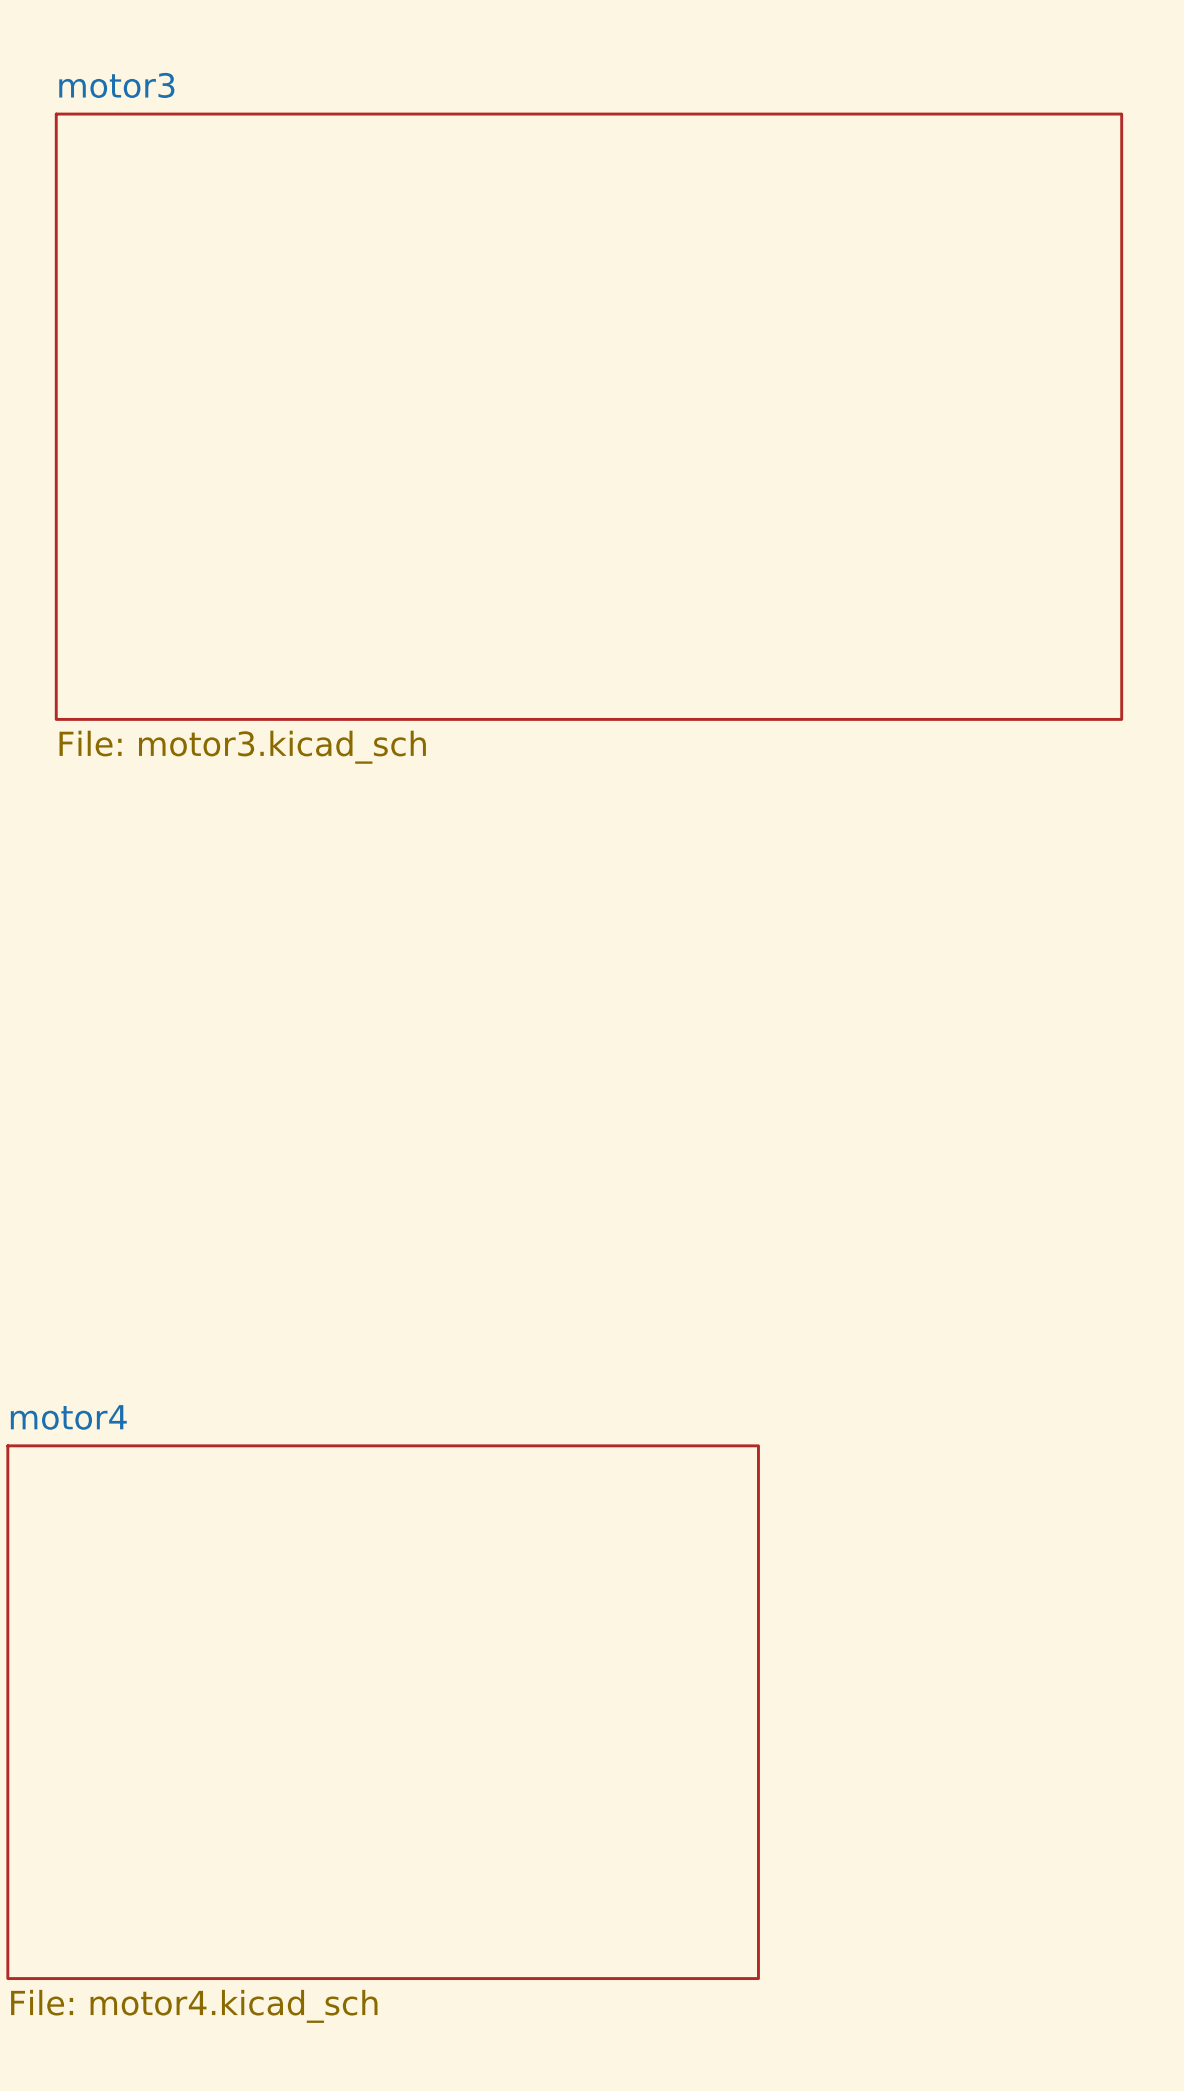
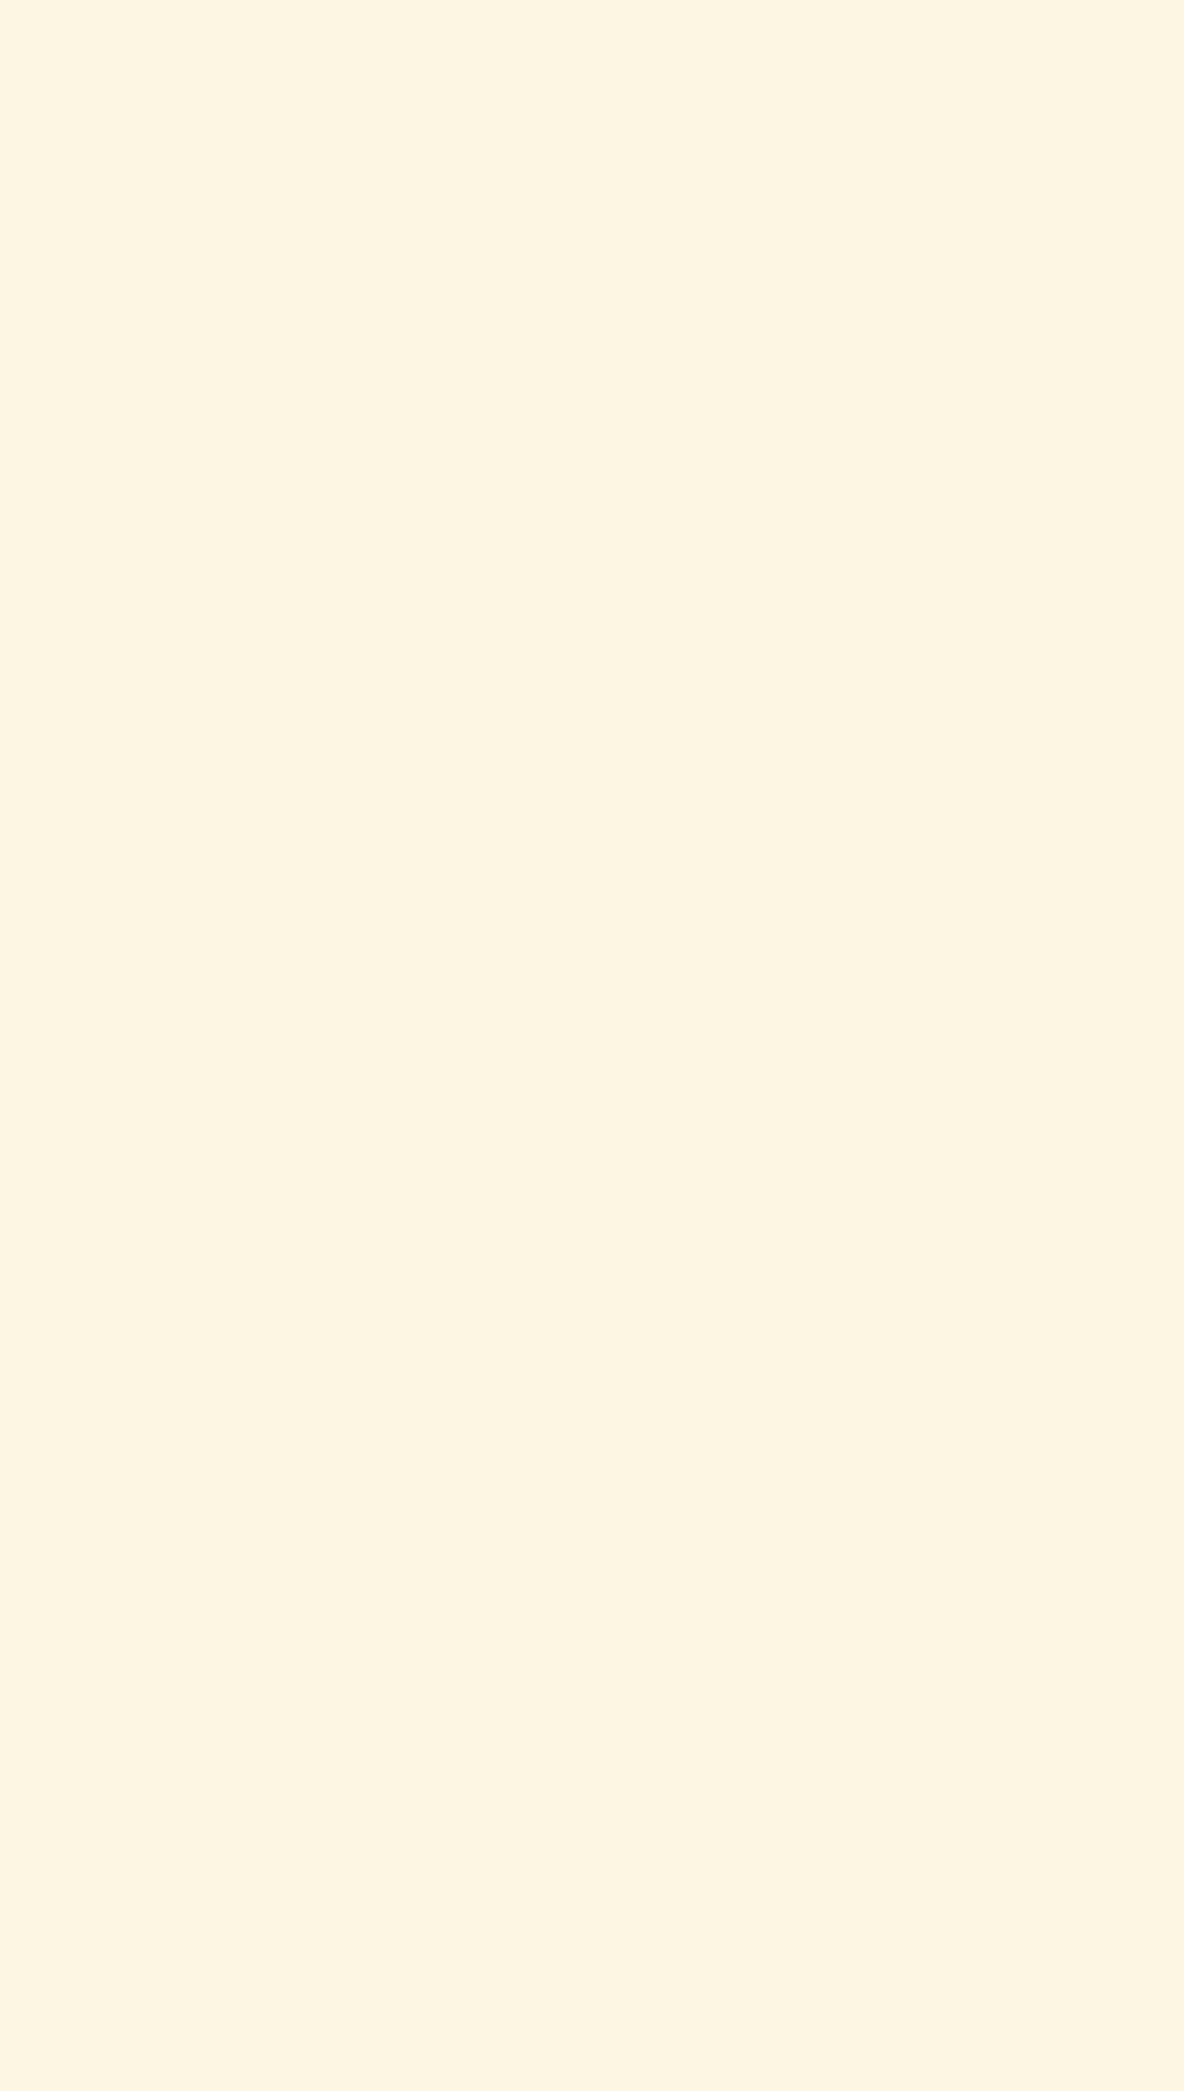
sheet motor3: File: motor3.kicad_sch (588, 416) -> none
sheet motor4: File: motor4.kicad_sch (383, 1712) -> none

